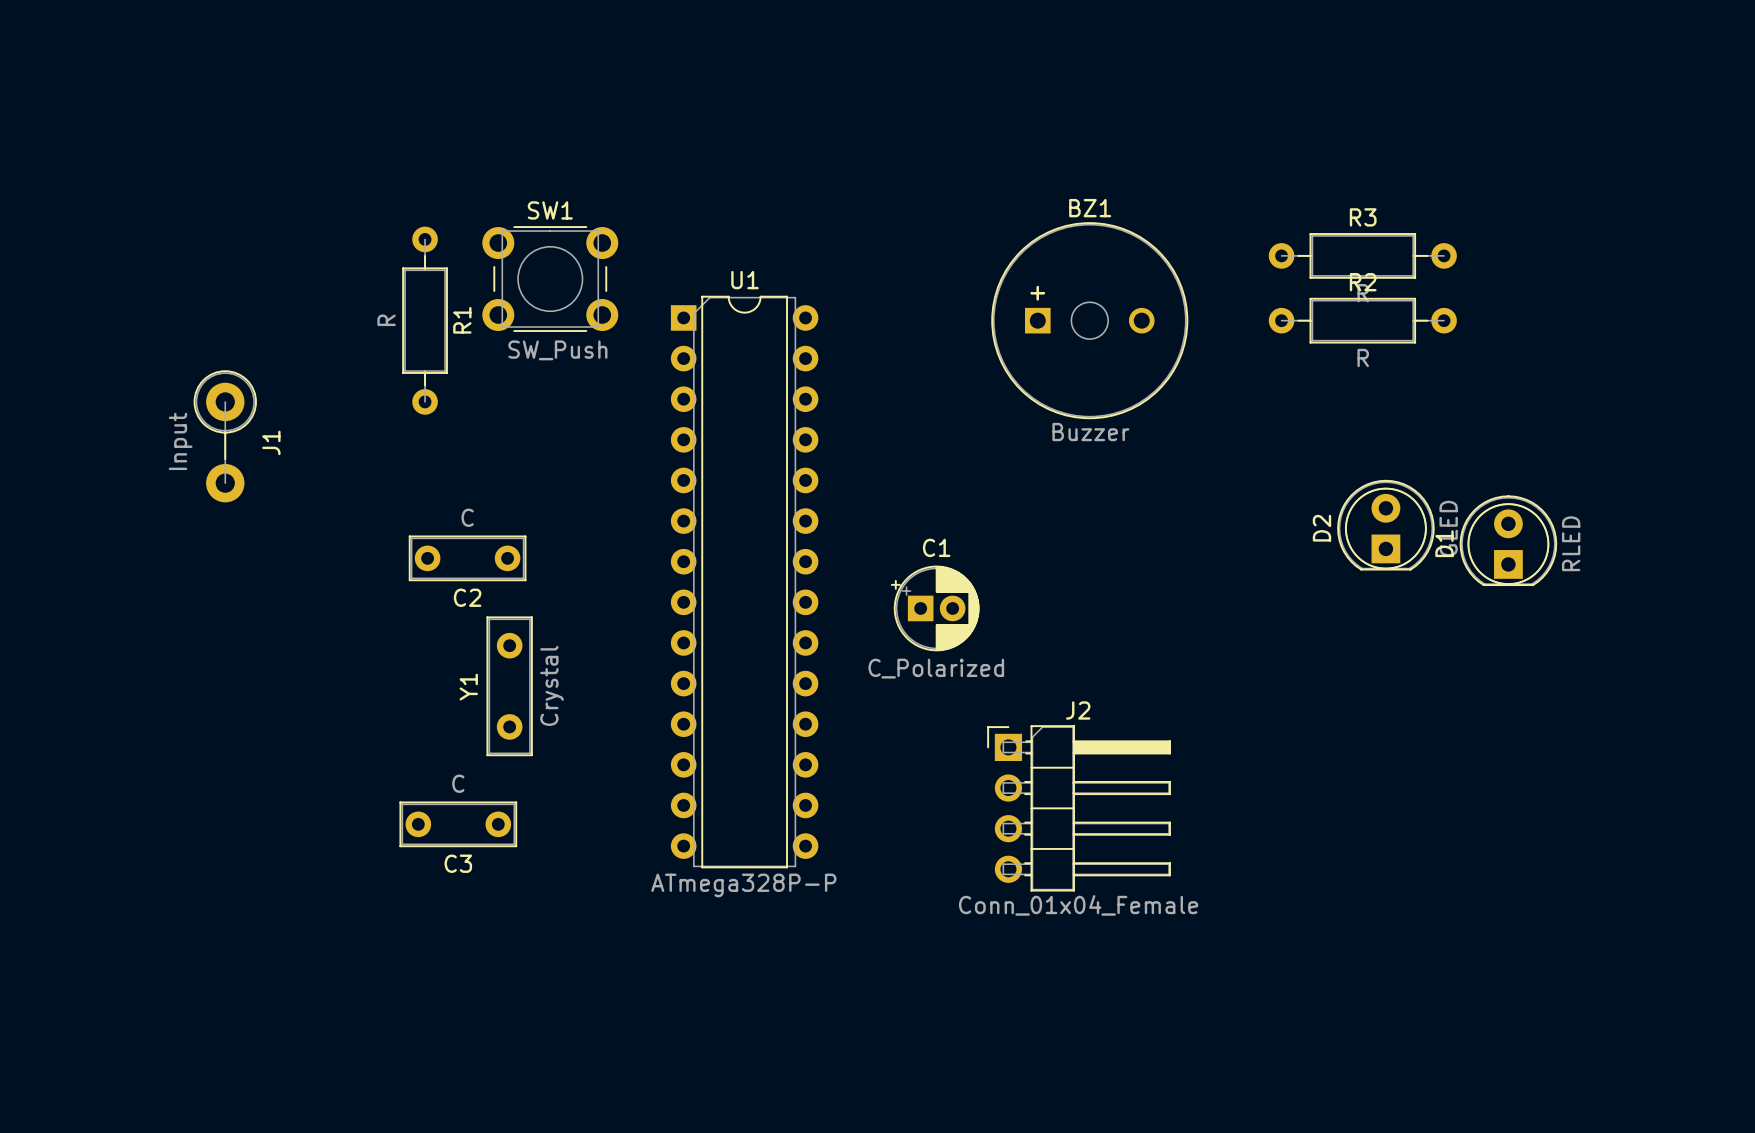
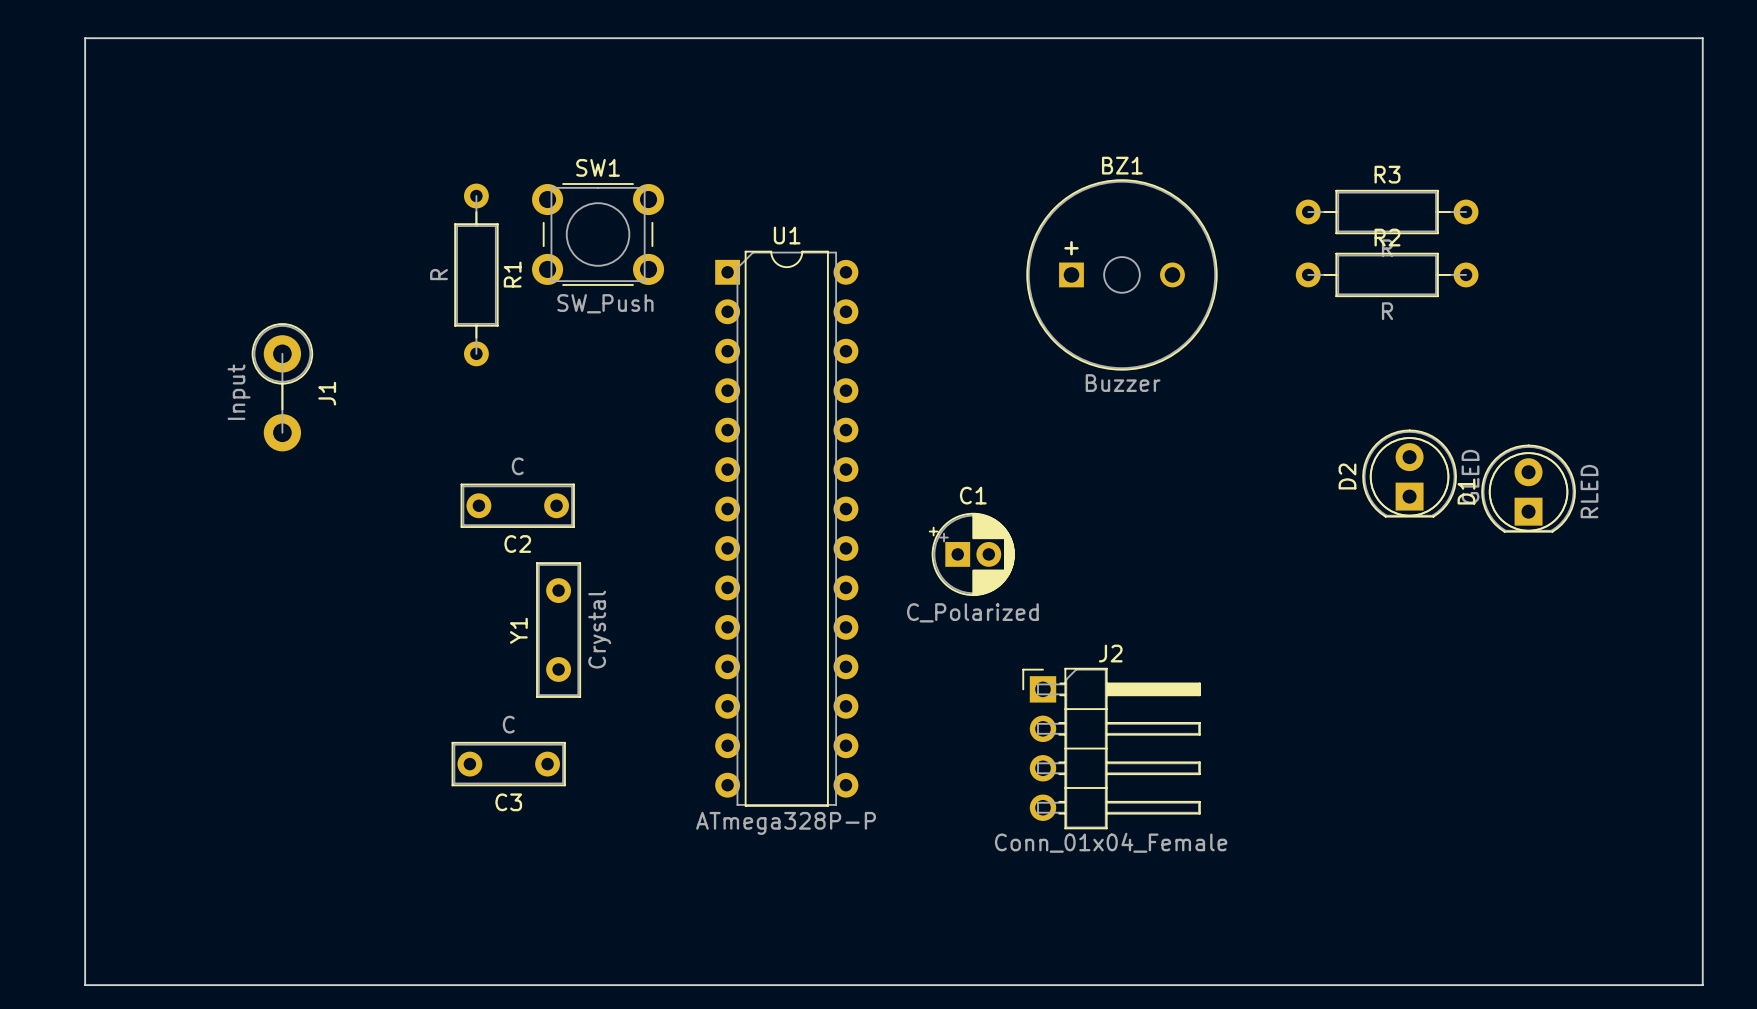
board edge: none -> (85, 38) (1702, 38) (1702, 985) (85, 985) (85, 38)

